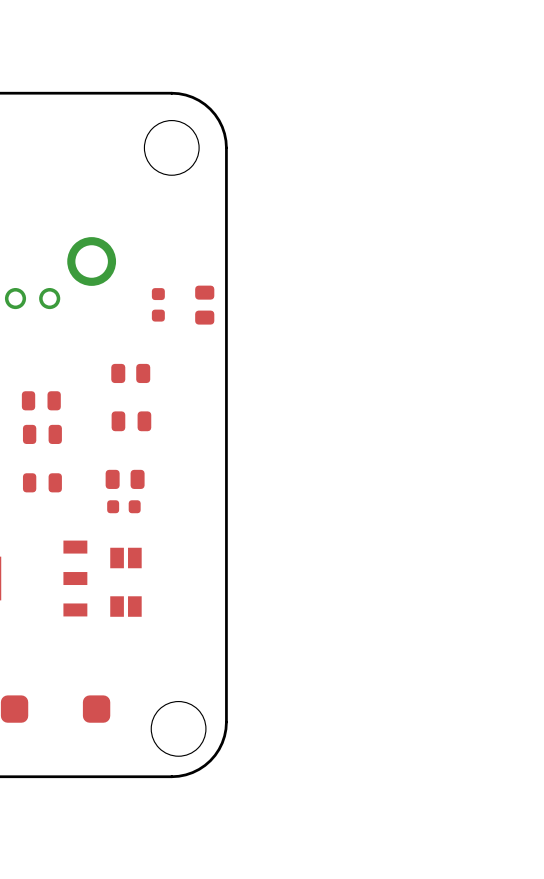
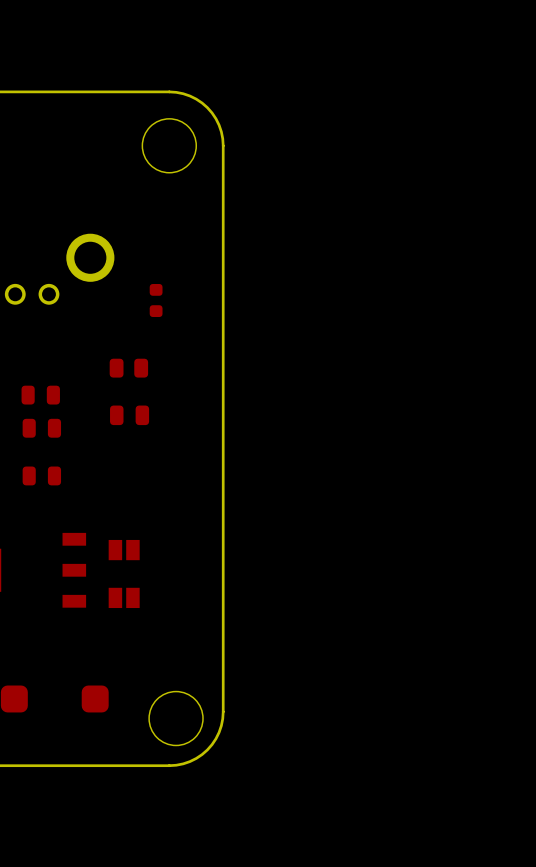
part: (204, 305) -> none
part: (125, 479) -> none
part: (123, 506) -> none

